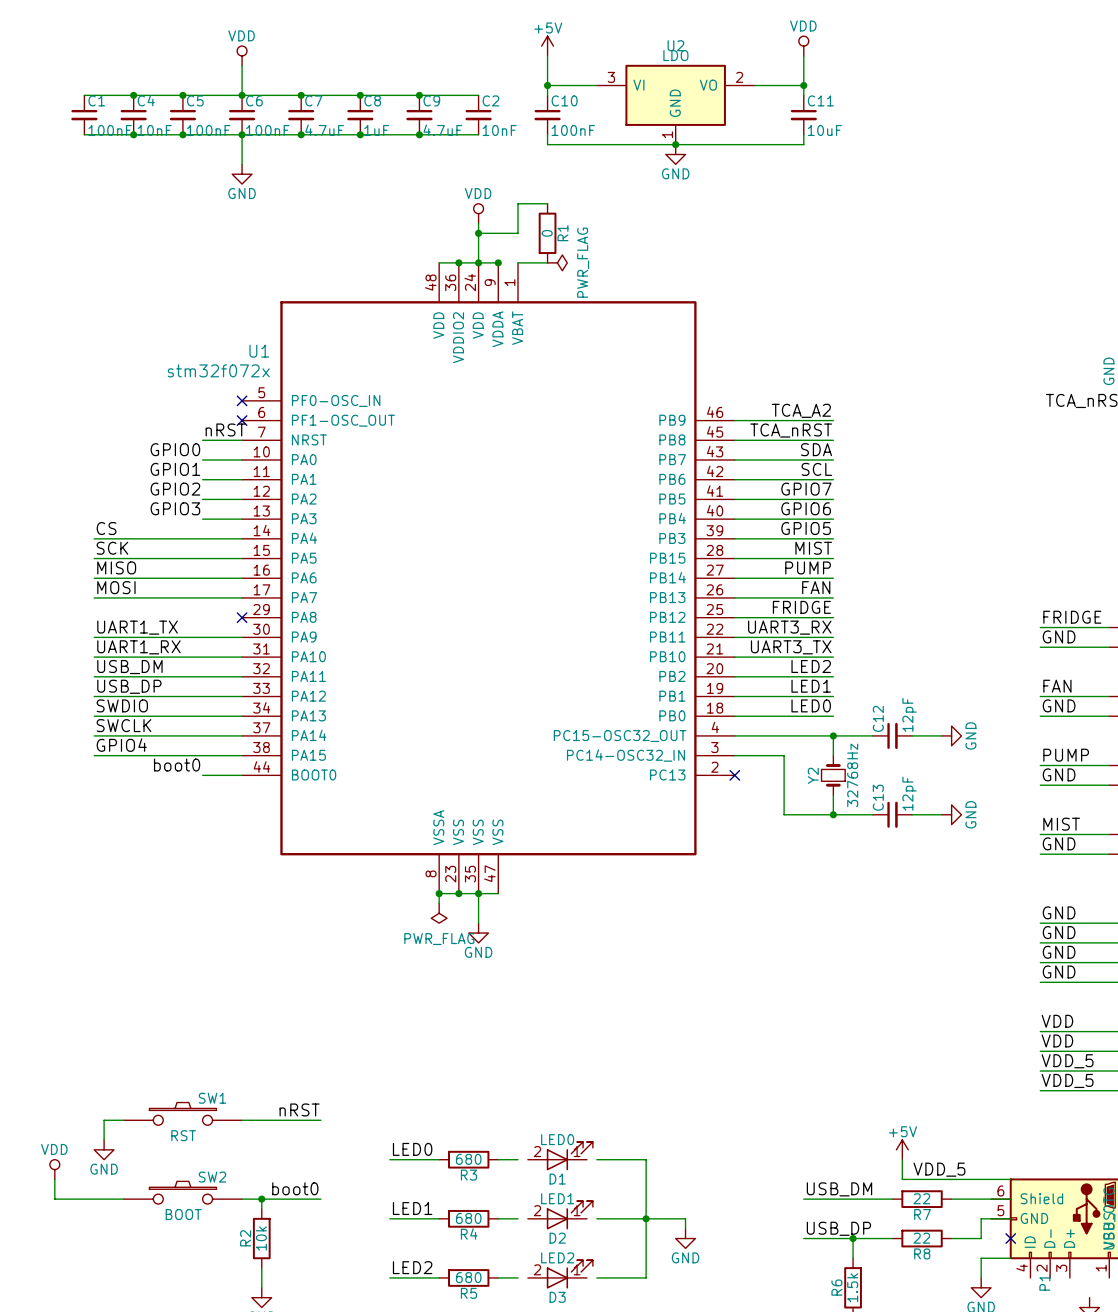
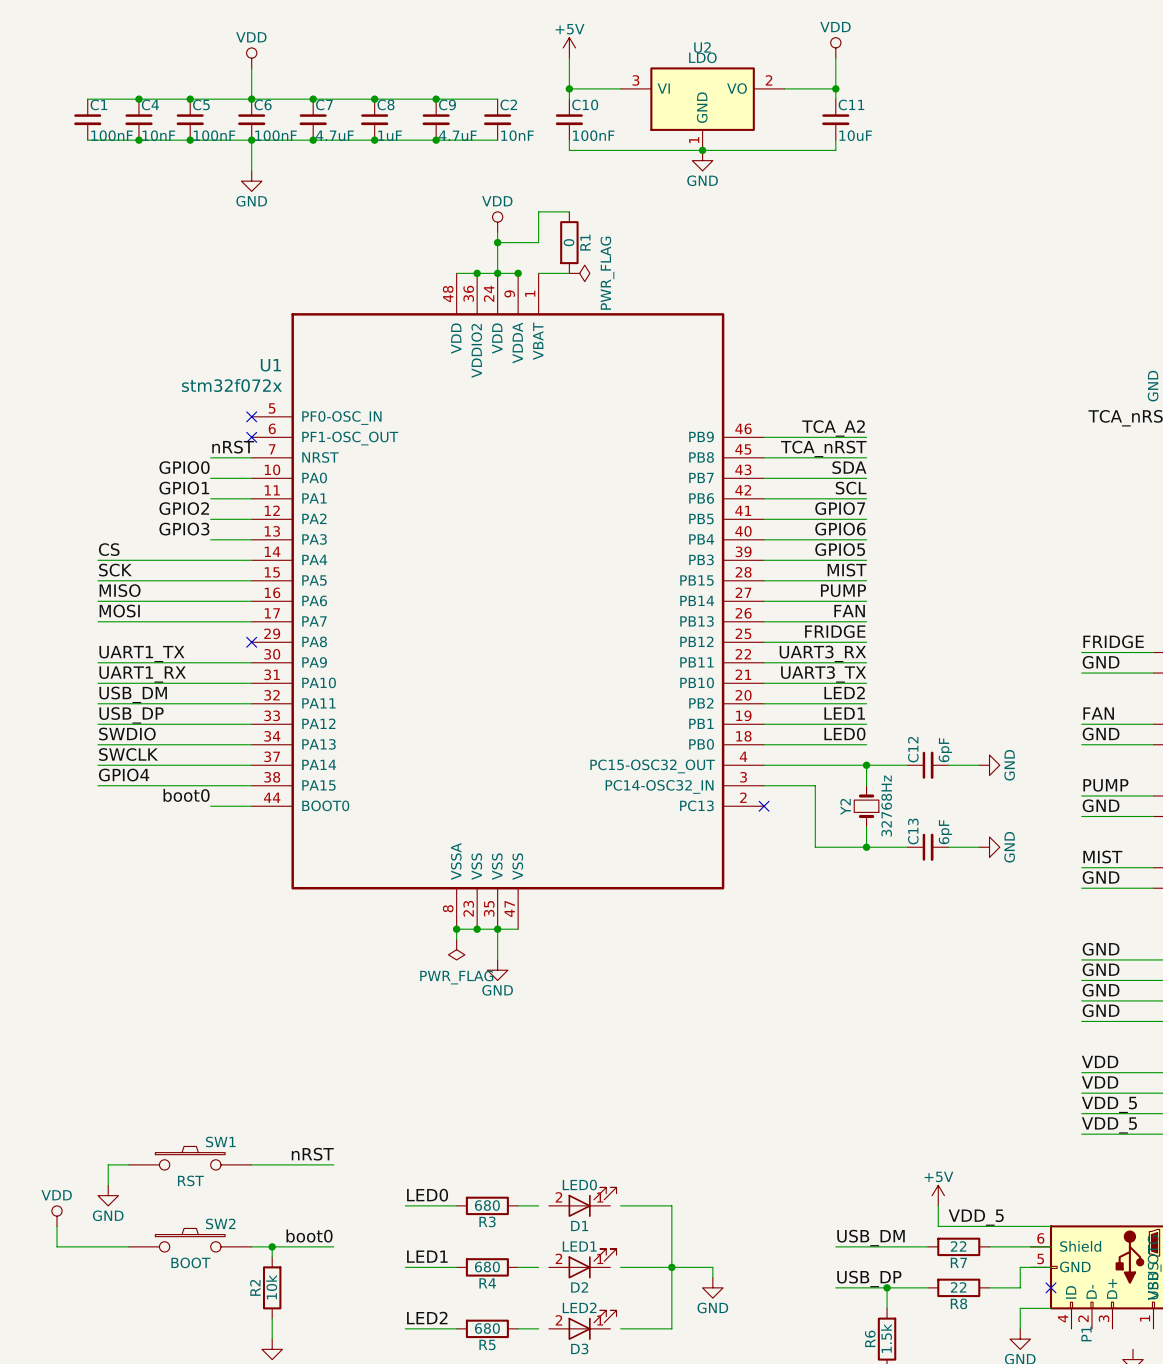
C12 value: 12pF (909, 714) -> 6pF (945, 750)
C13 value: 12pF (909, 793) -> 6pF (945, 832)

